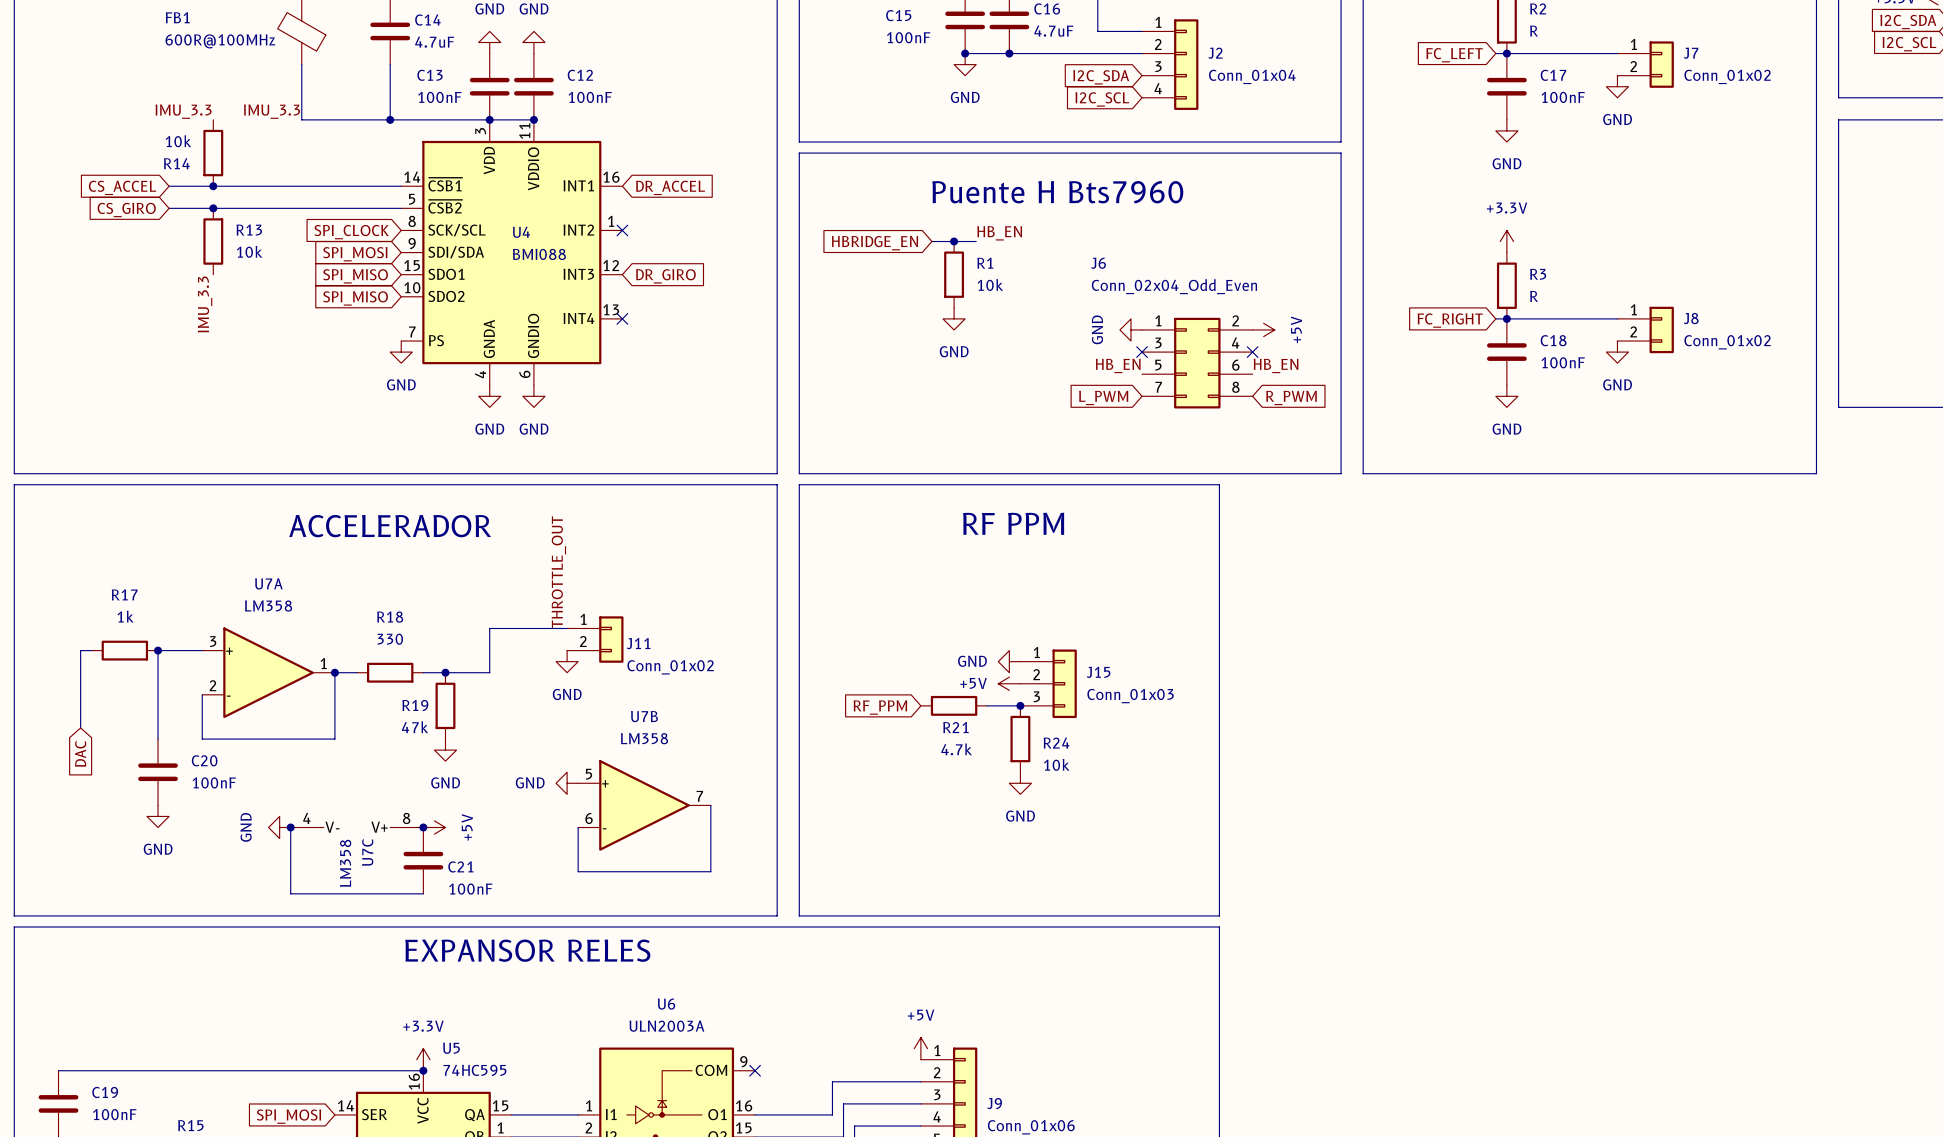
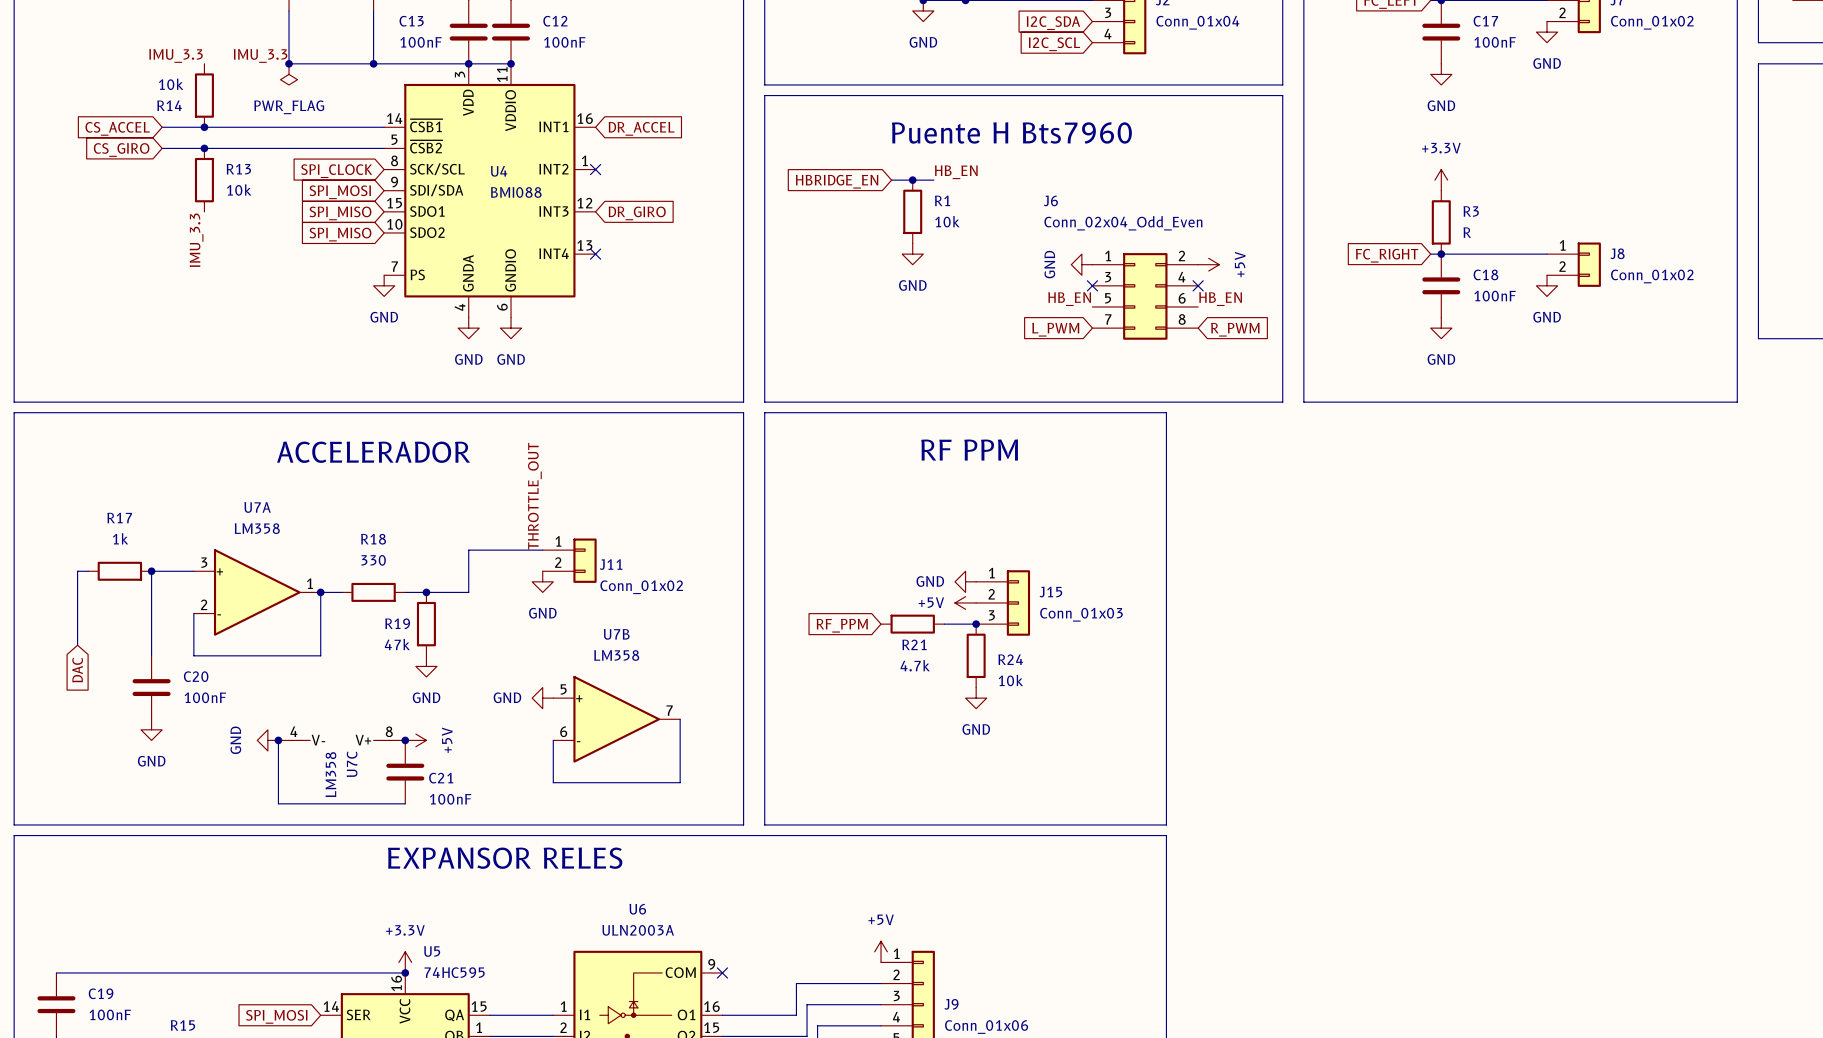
junction: none -> (289, 63)
power symbol: none -> PWR_FLAG (289, 74)

